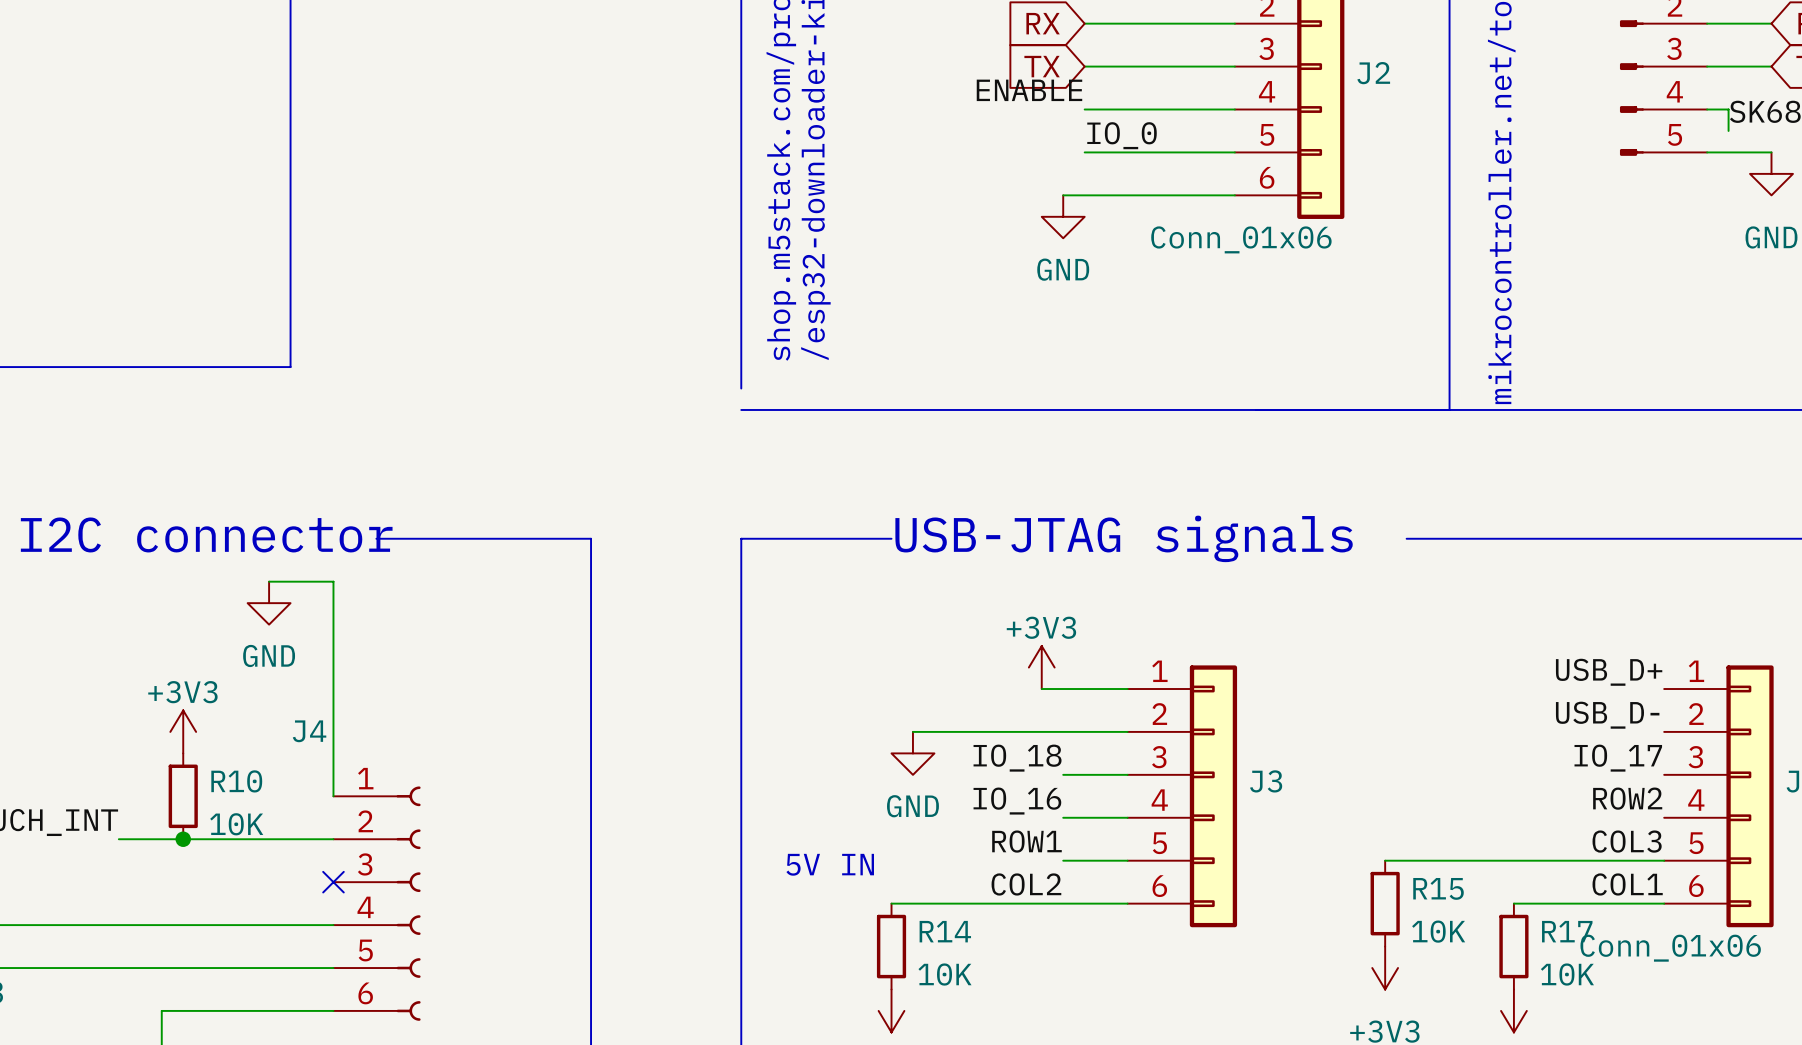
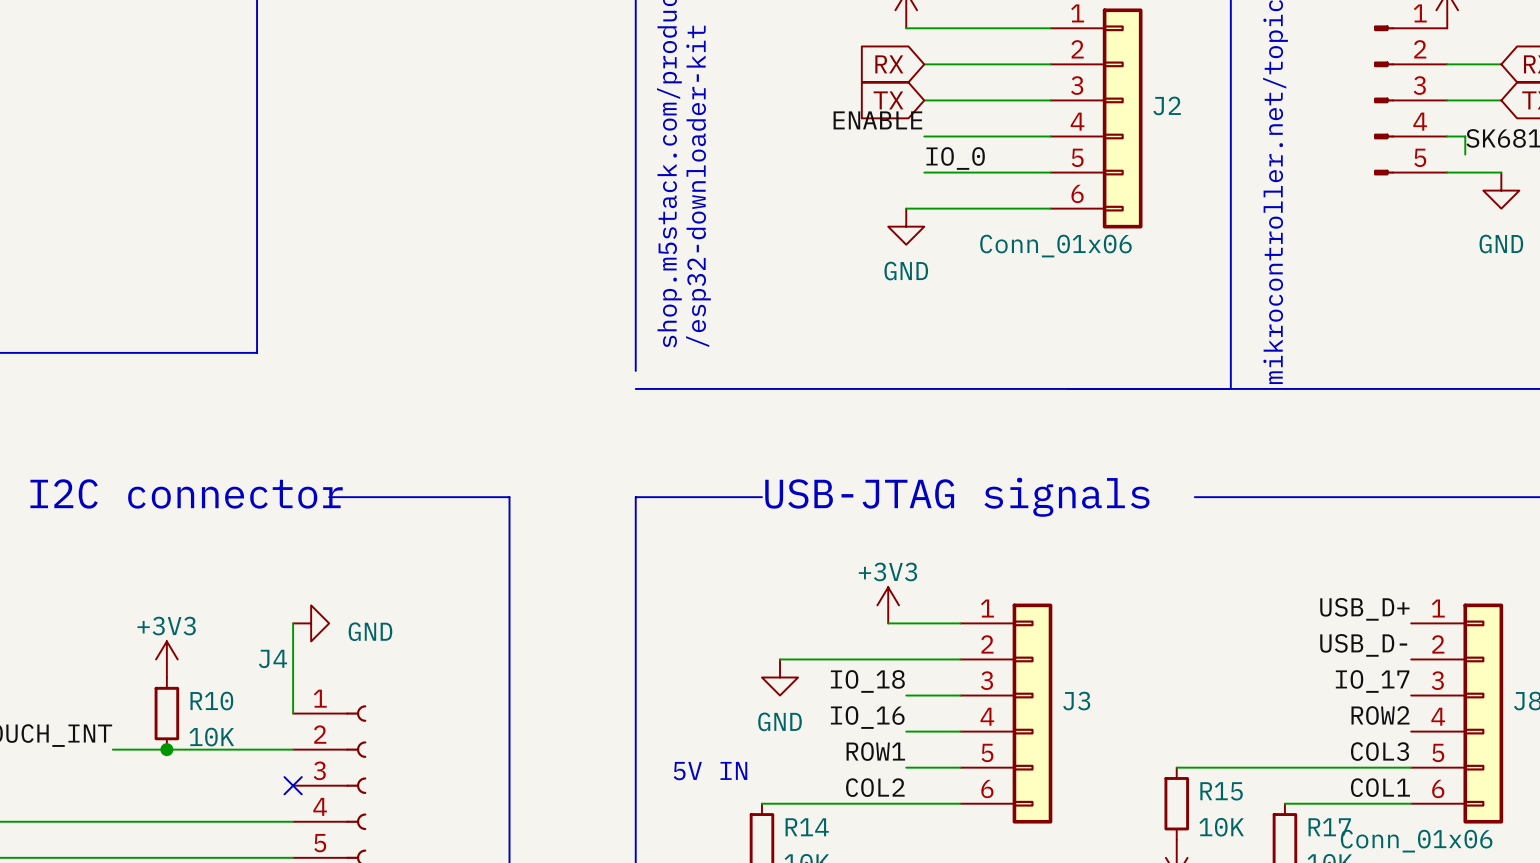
wire: (269, 581) (333, 581) (333, 689) -> none
power symbol rotation: 0° (269, 603) -> 90° counterclockwise (311, 623)
power symbol position: GND (269, 603) -> GND (311, 623)

